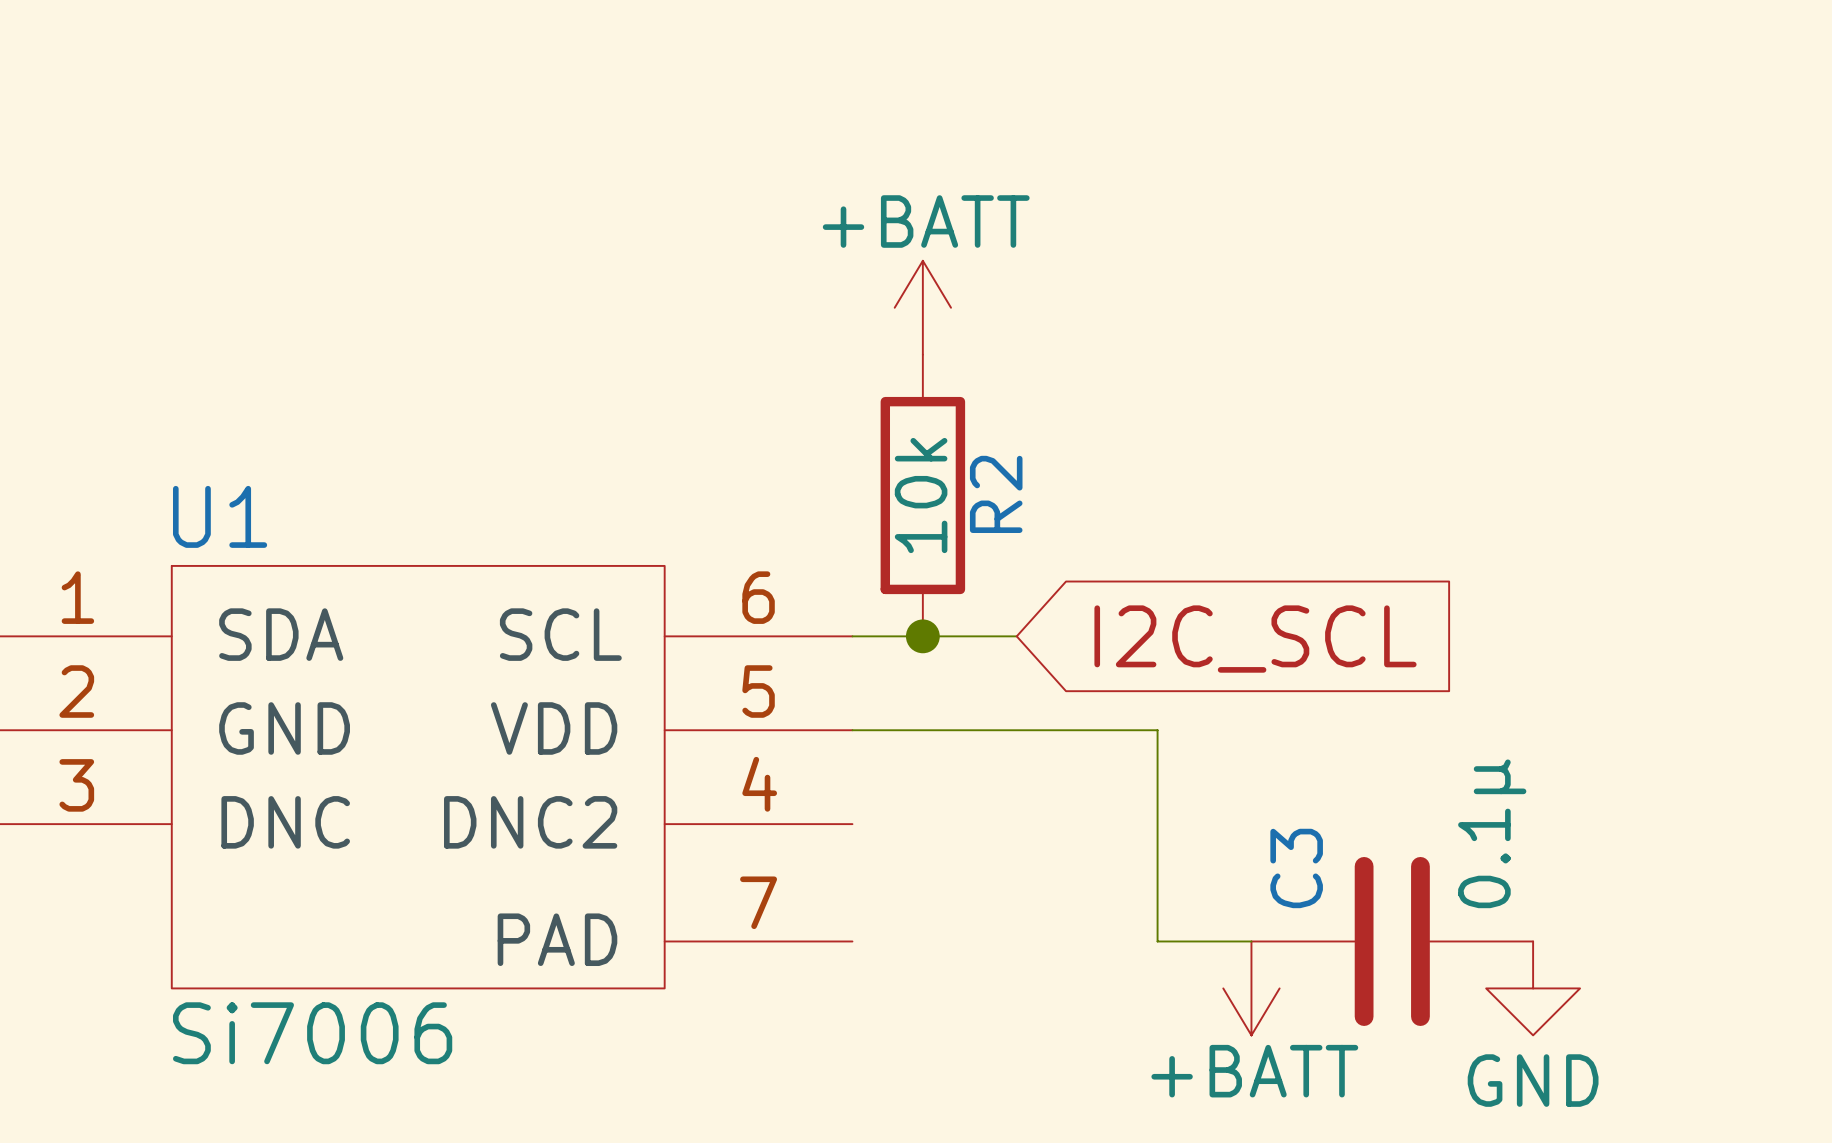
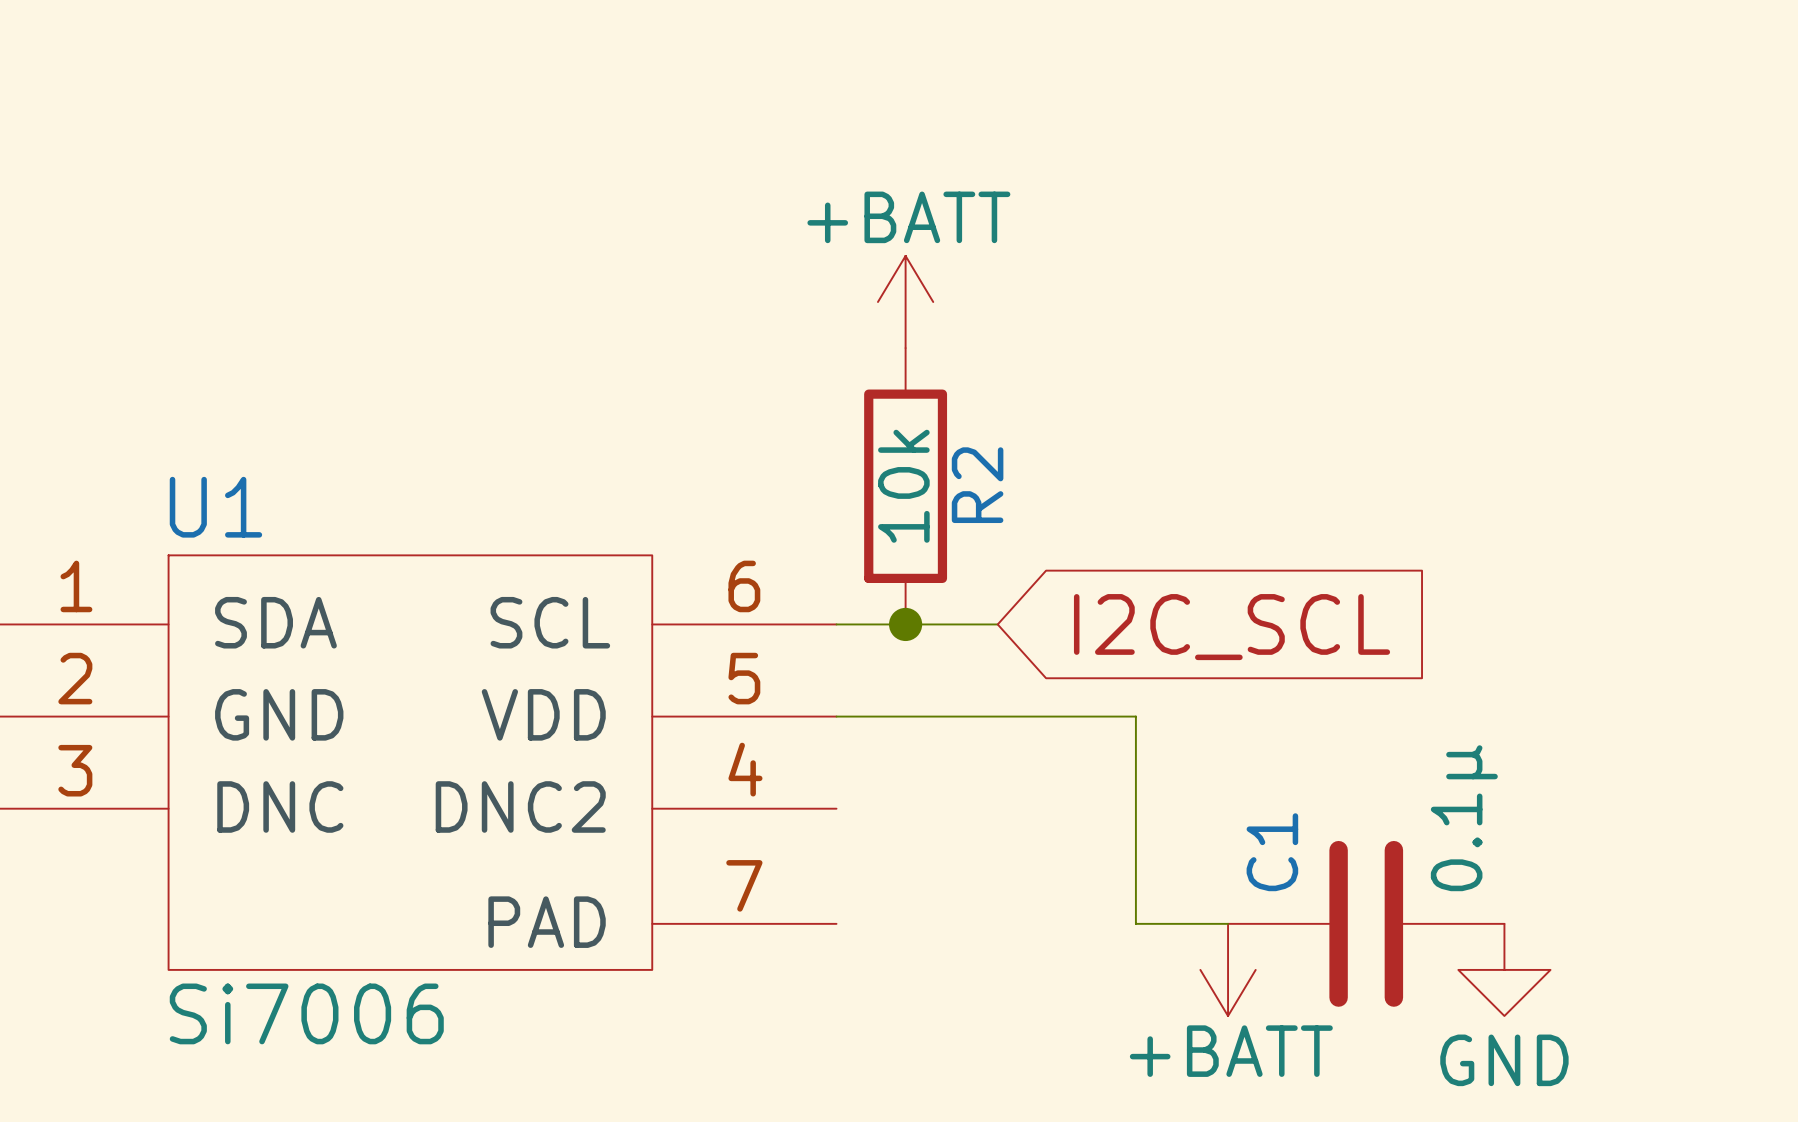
C3 name: C3 (1296, 868) -> C1 (1272, 852)

